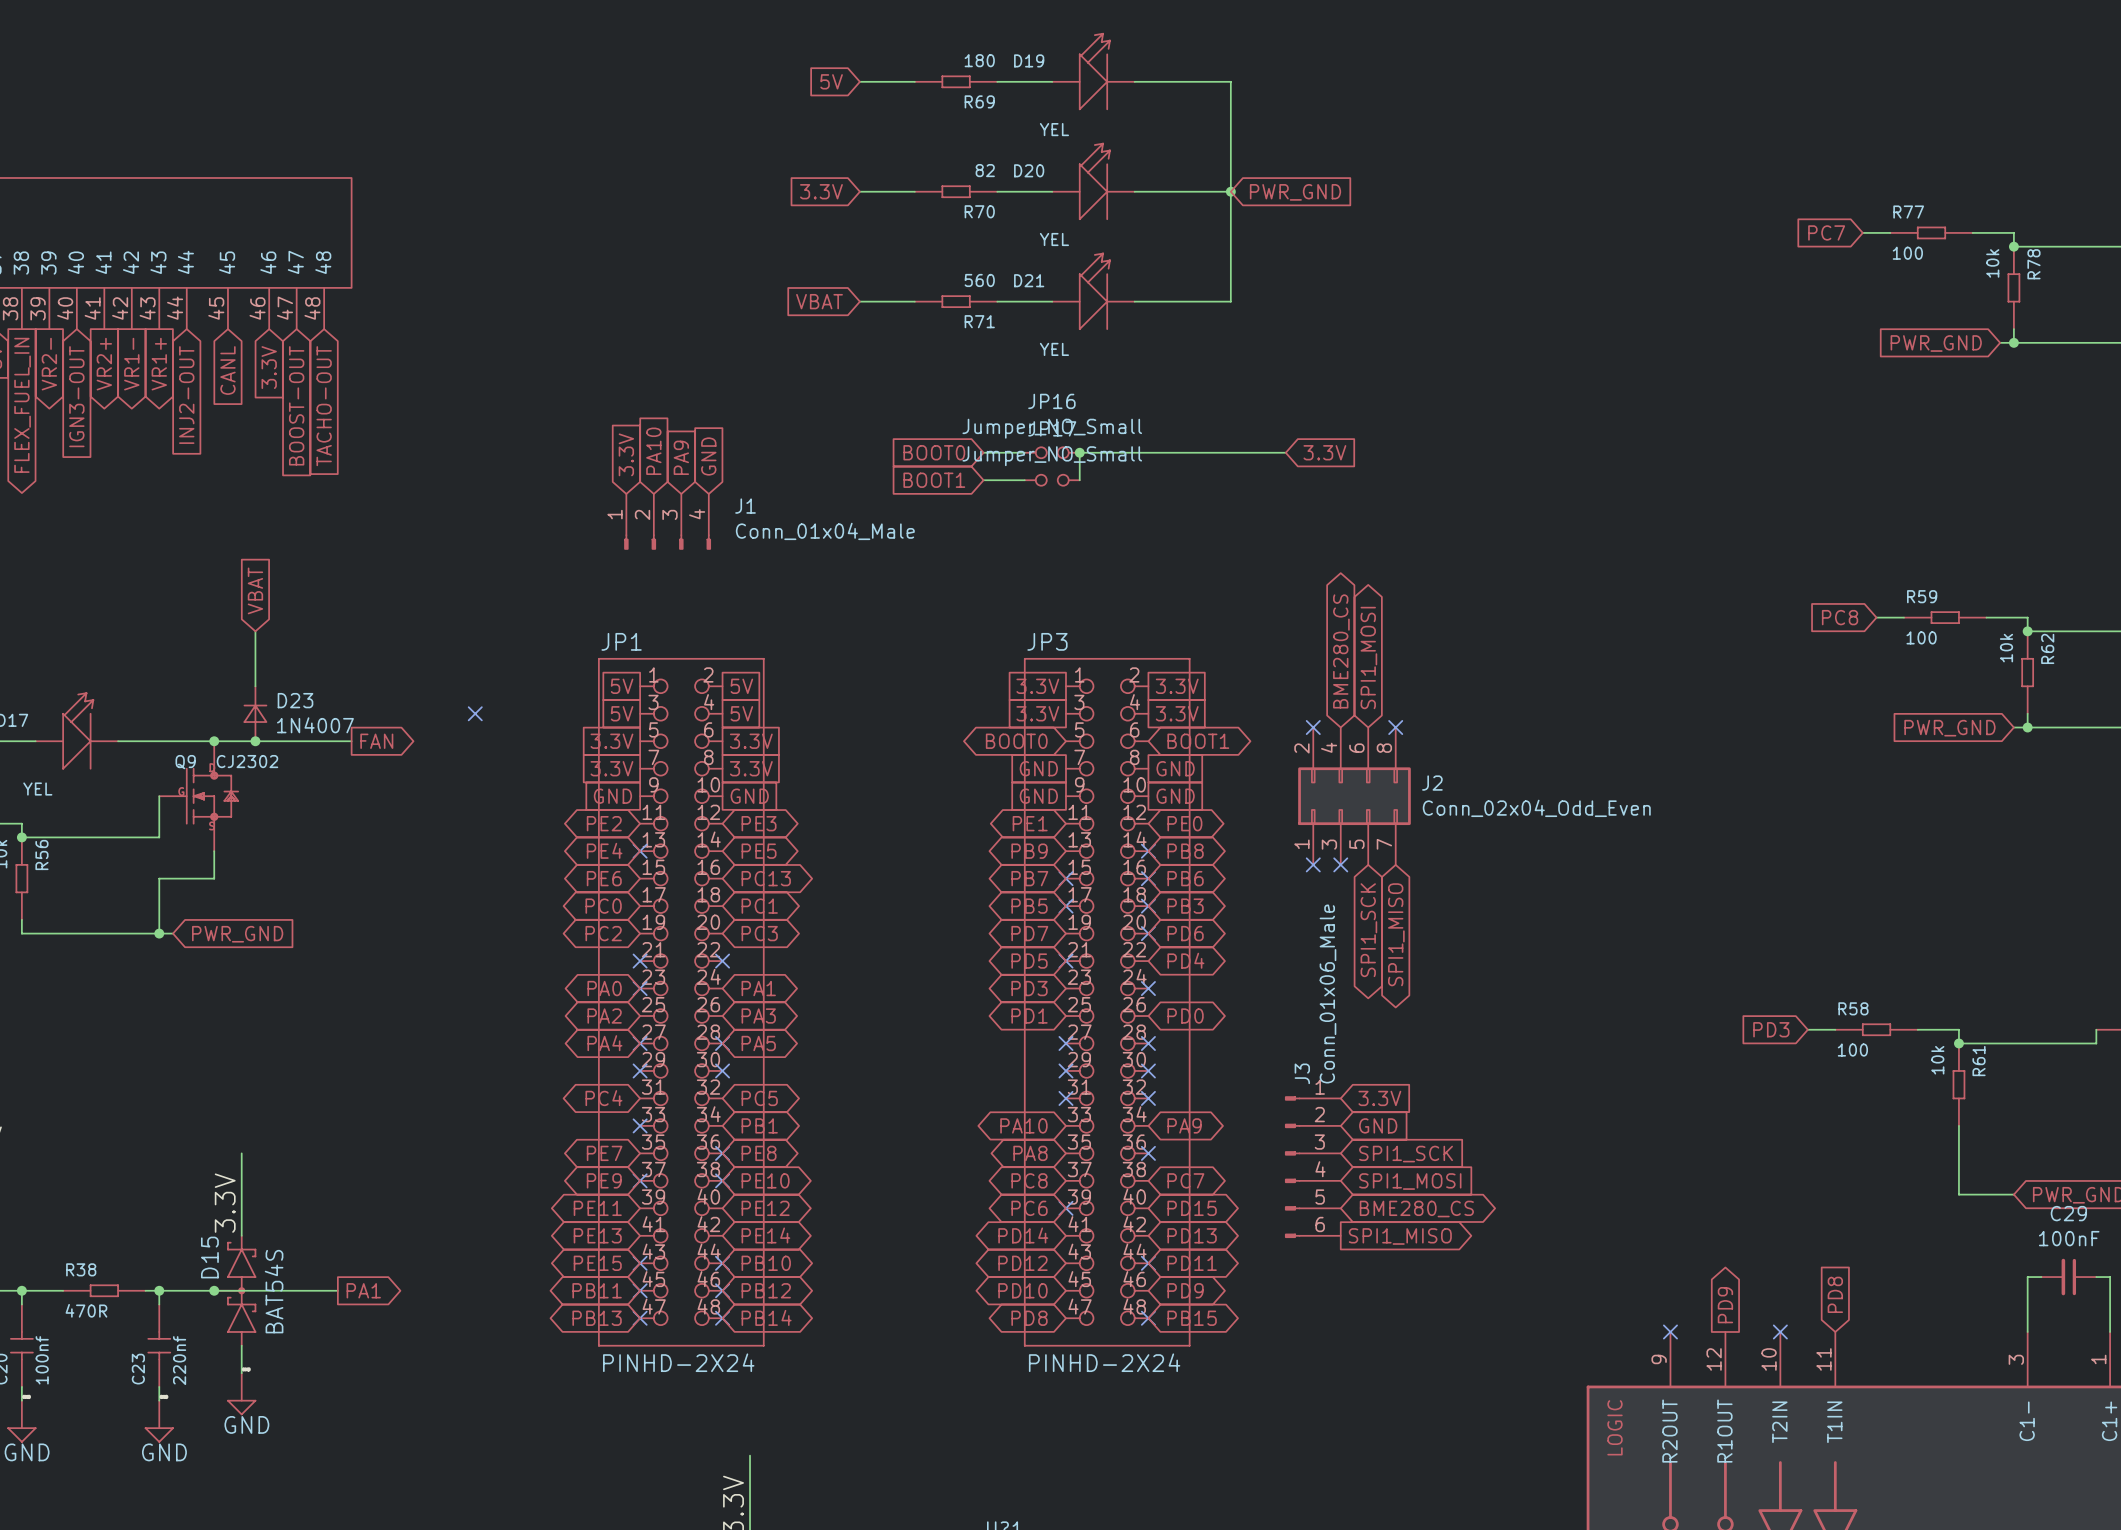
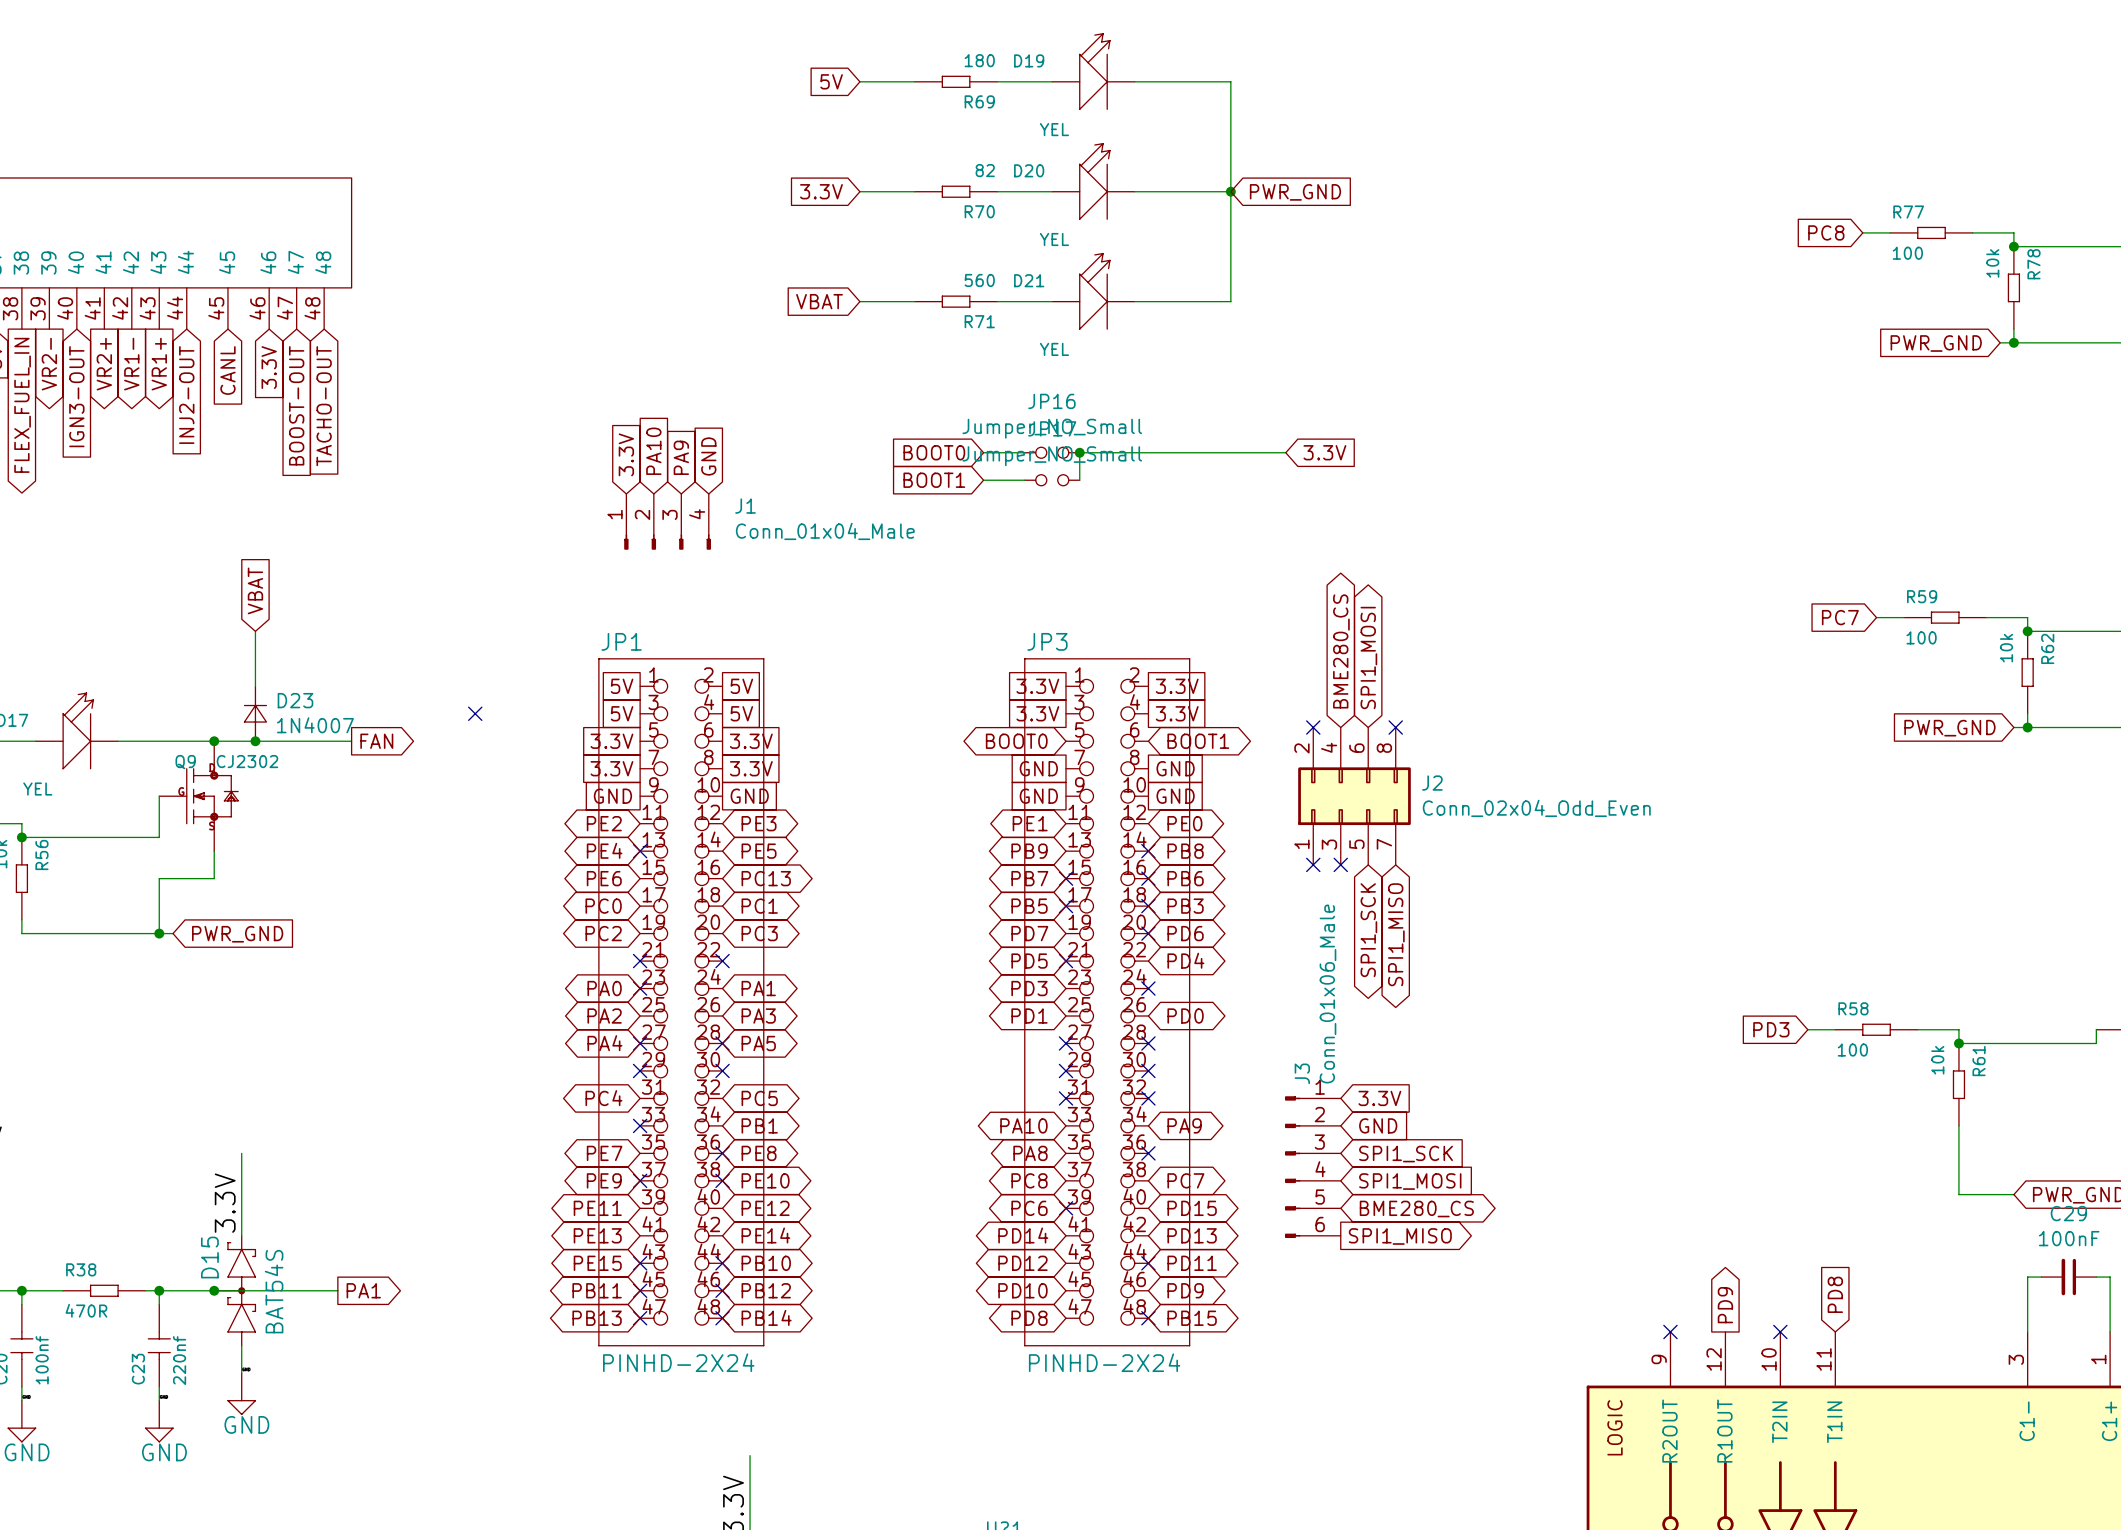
global label: PC7 (1826, 232) -> PC8 (1826, 232)
global label: PC8 (1840, 617) -> PC7 (1840, 617)

